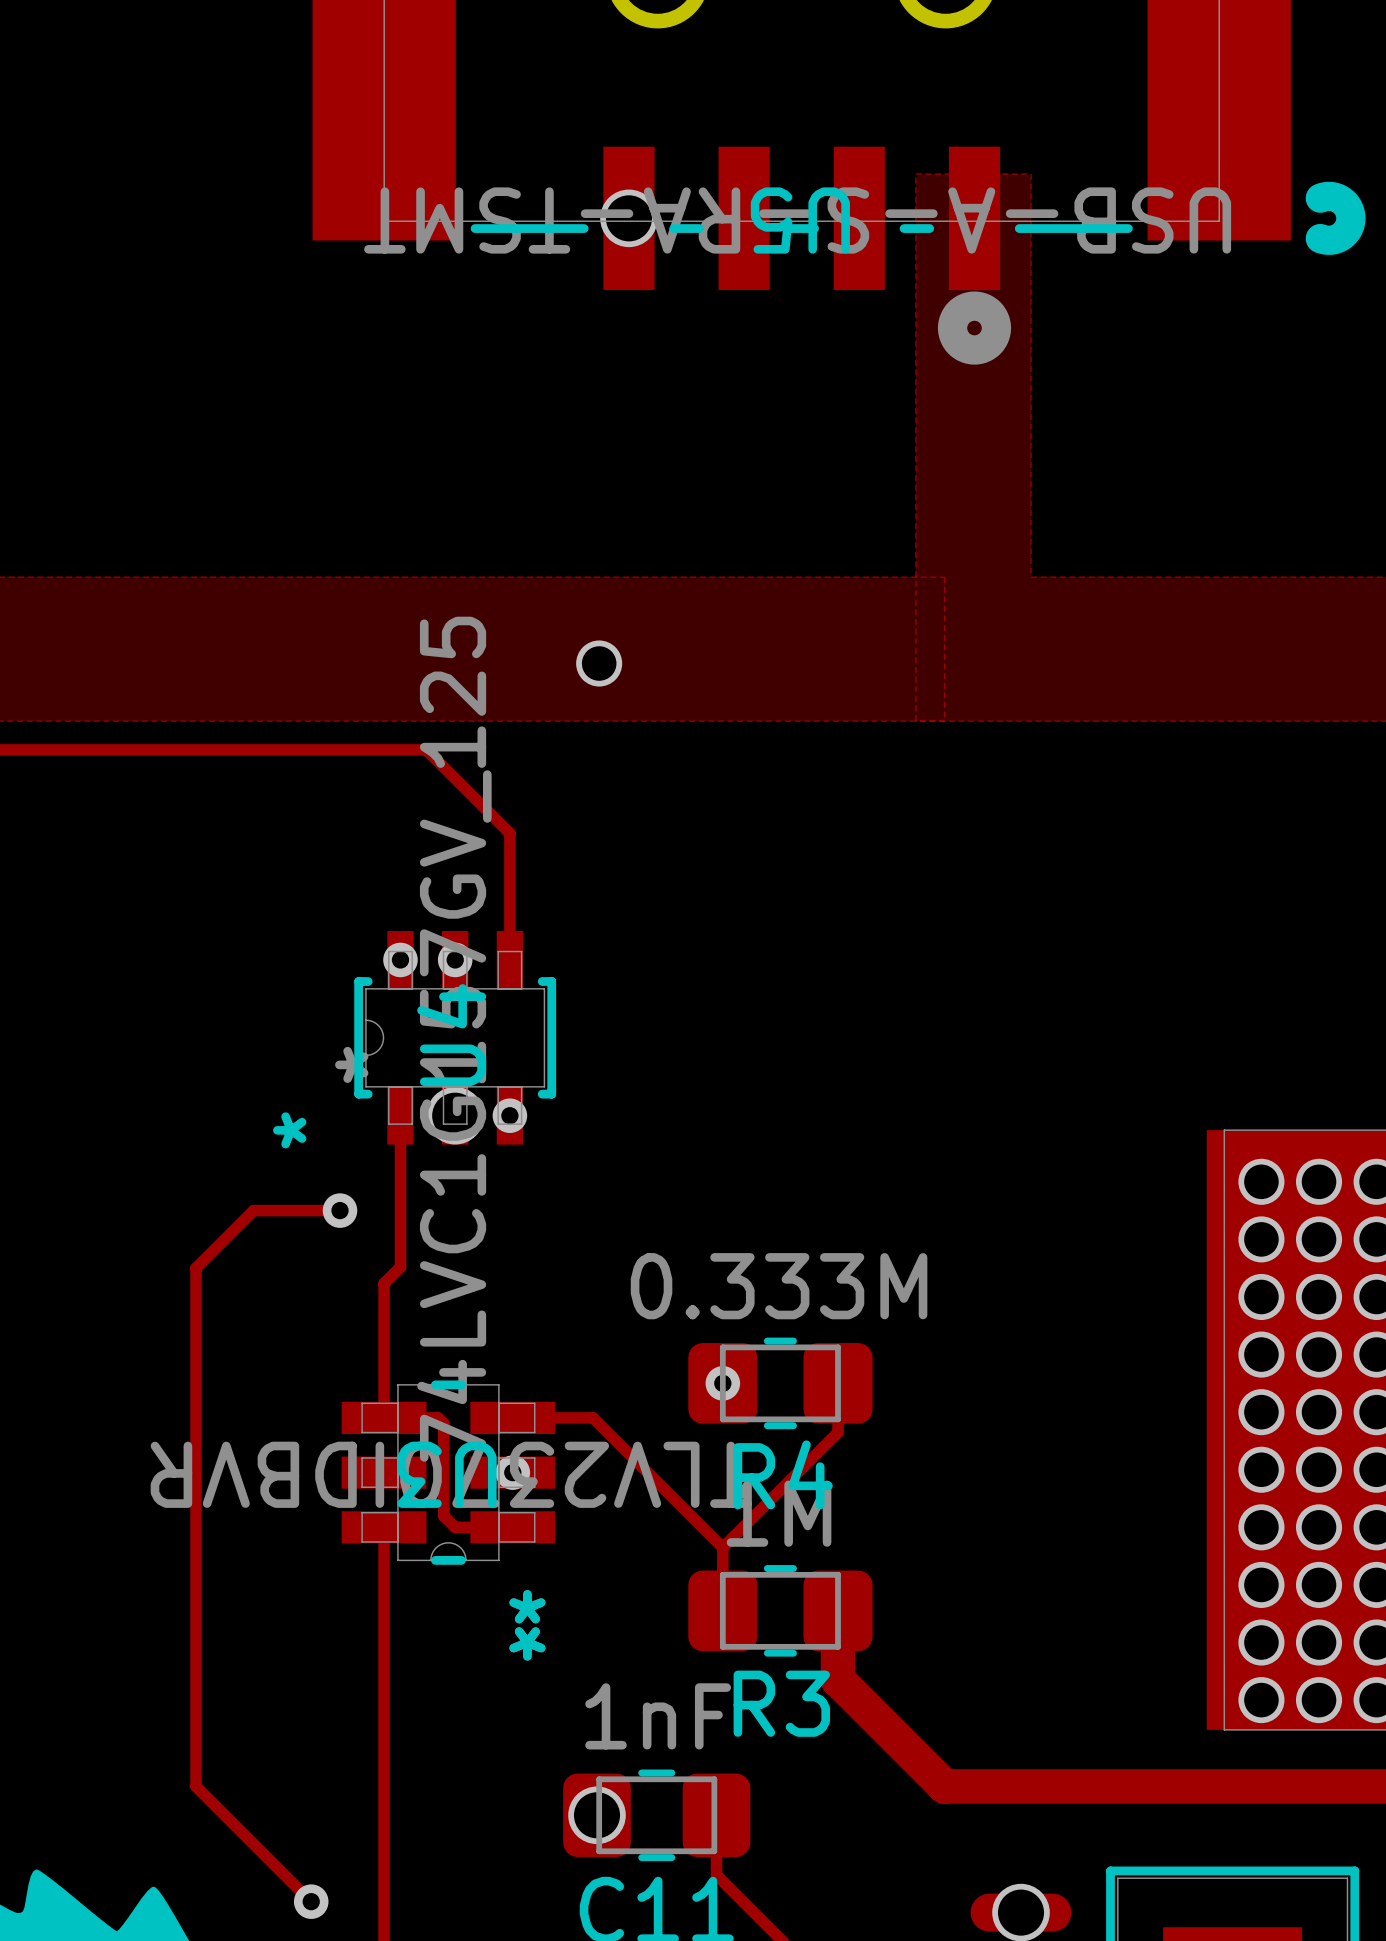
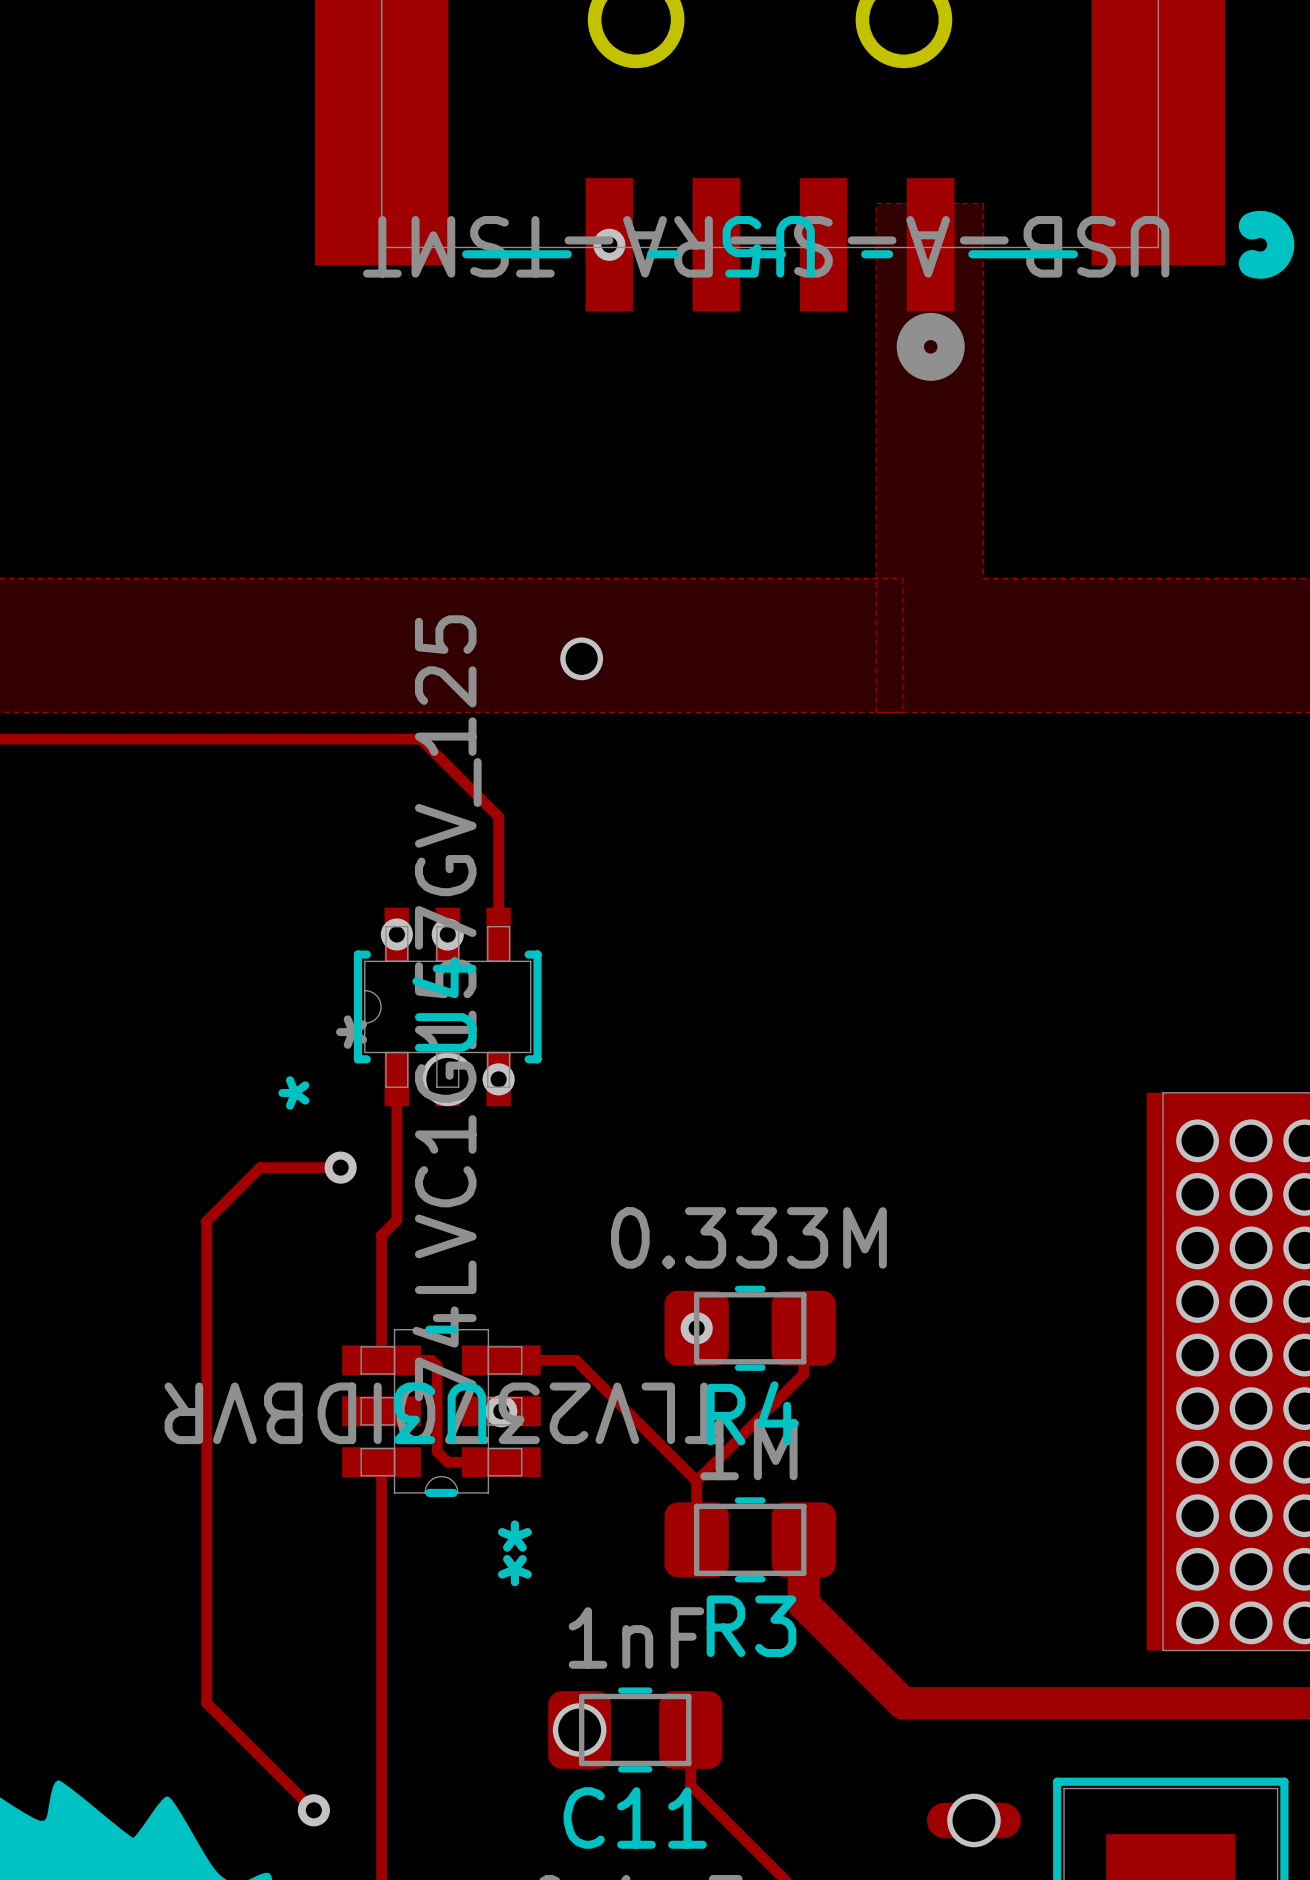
via size: [600, 189, 658, 248] -> [593, 228, 626, 261]

